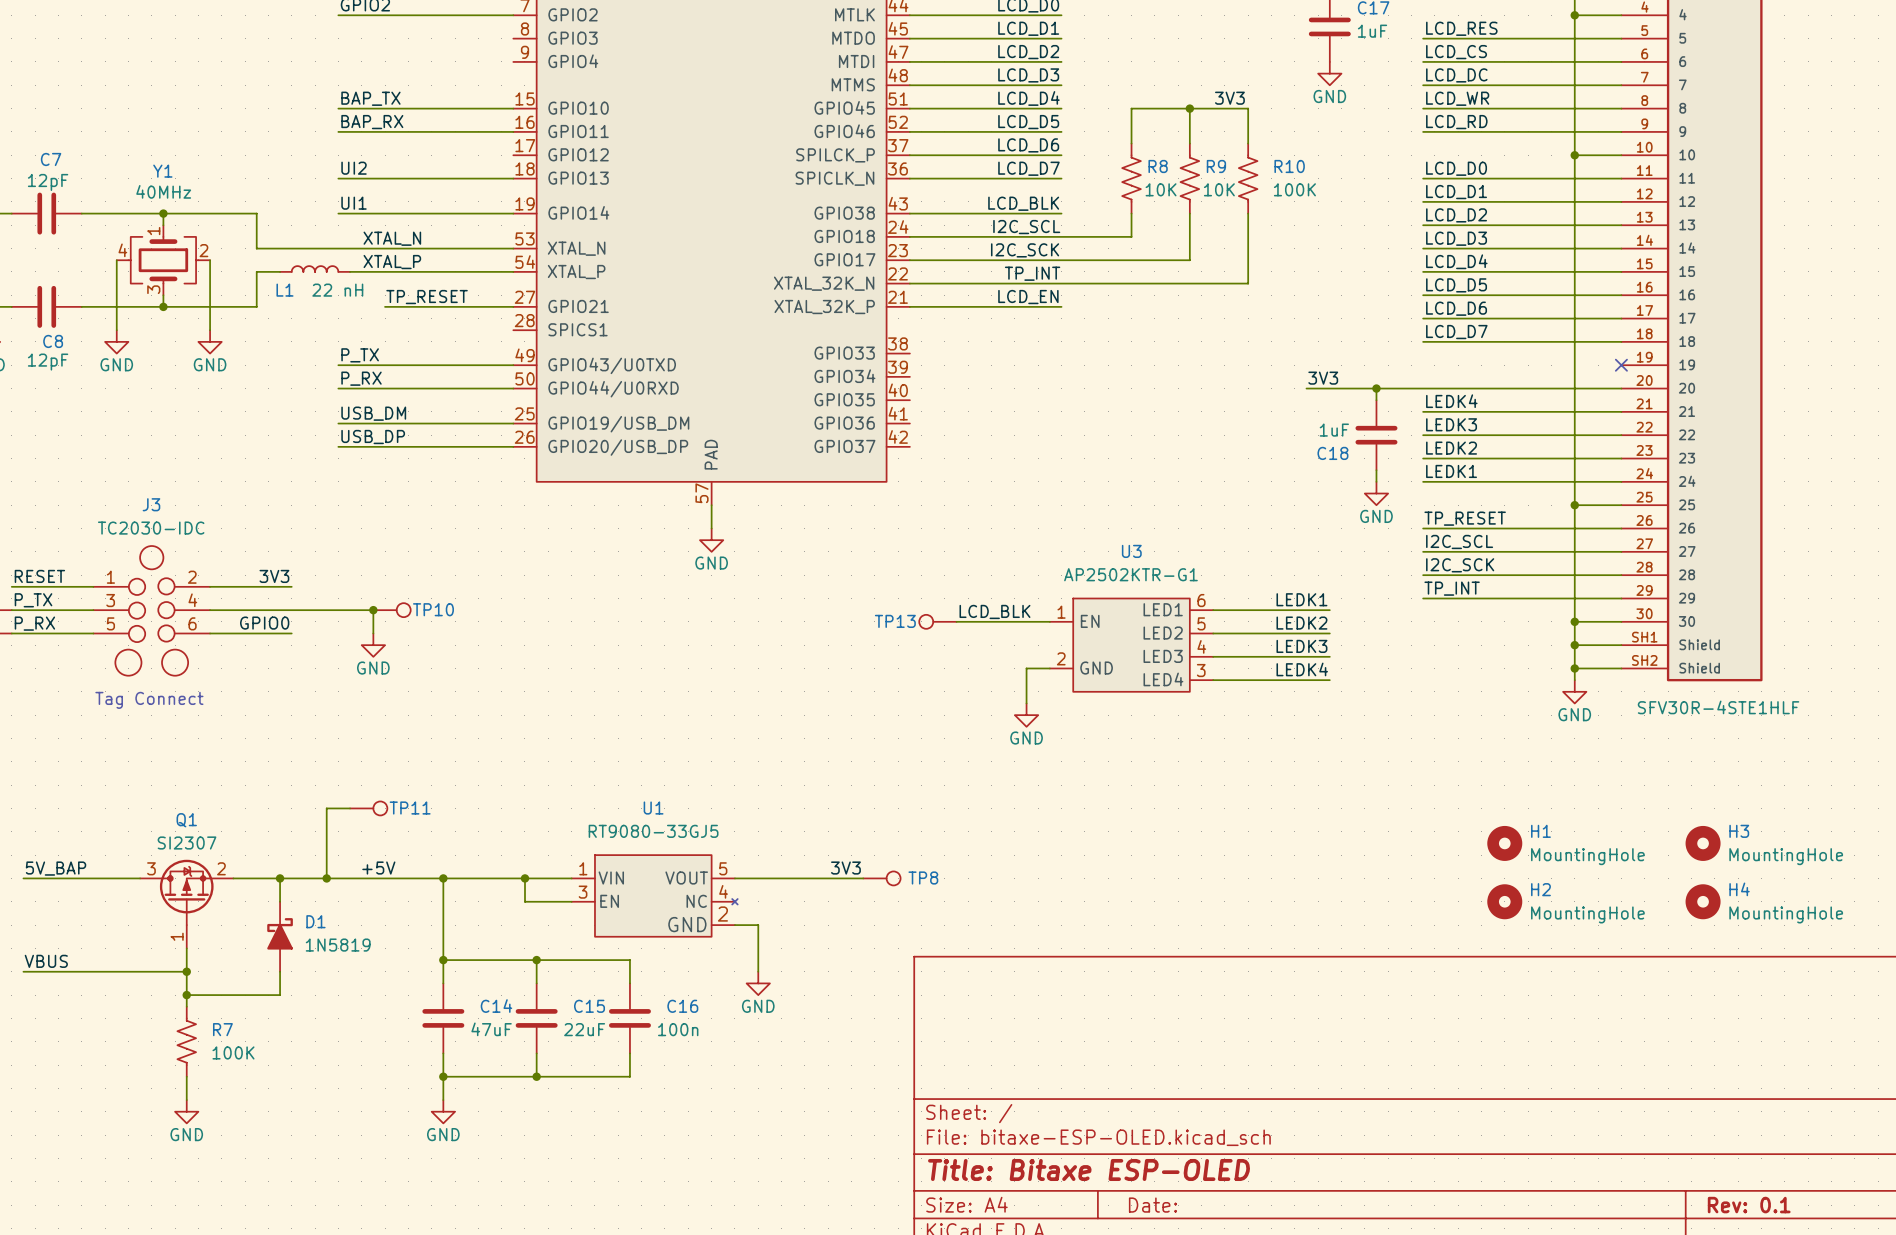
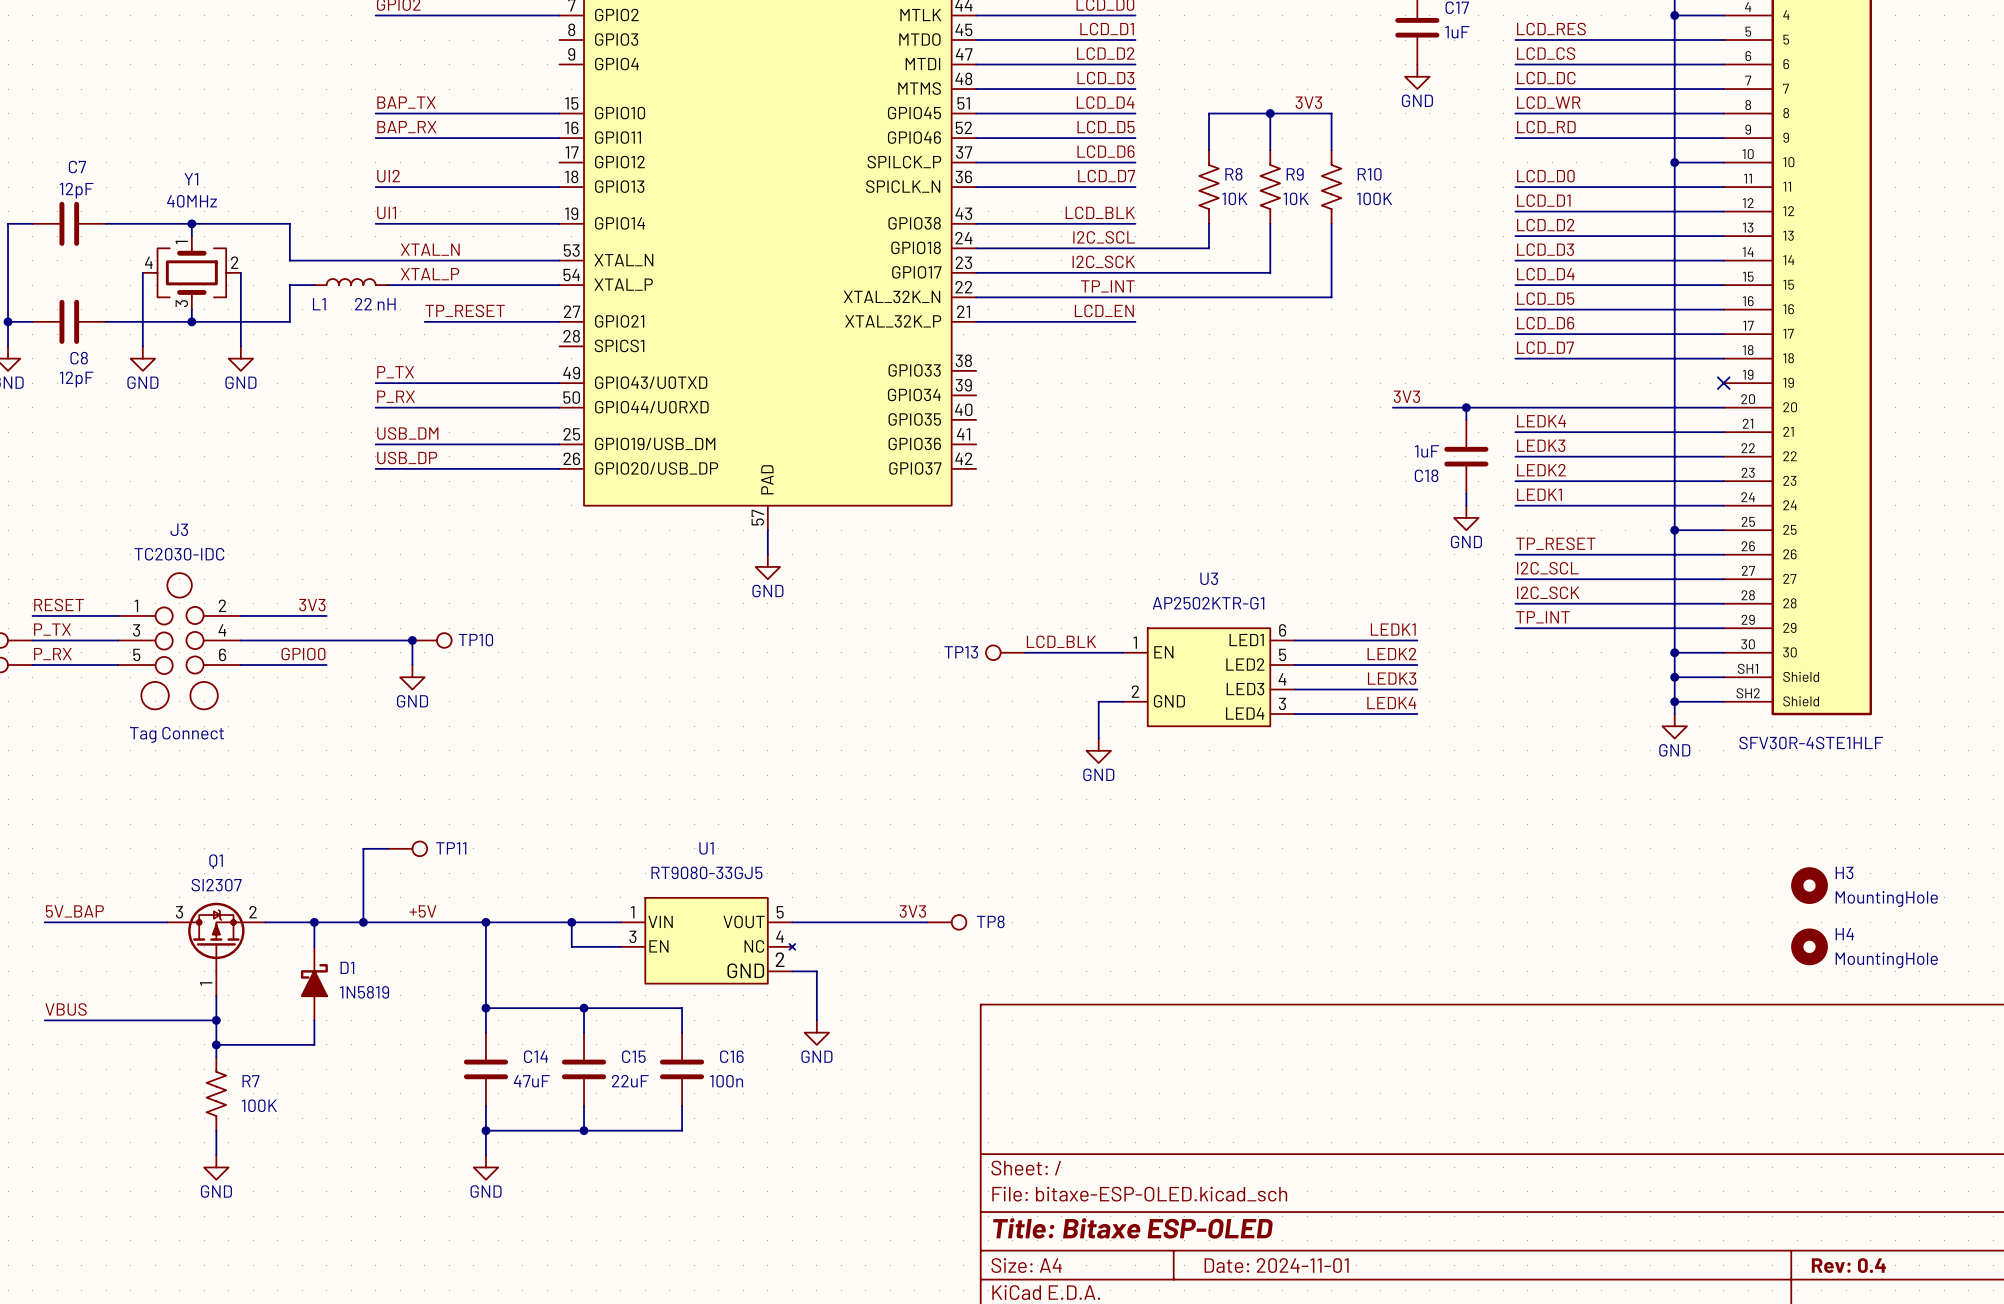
H1: MountingHole (1504, 843) -> none
H2: MountingHole (1504, 901) -> none
title block: Date: (1152, 1205) -> Date: 2024-11-01 (1276, 1265)
title block: Rev: 0.1 (1749, 1205) -> Rev: 0.4 (1848, 1265)

